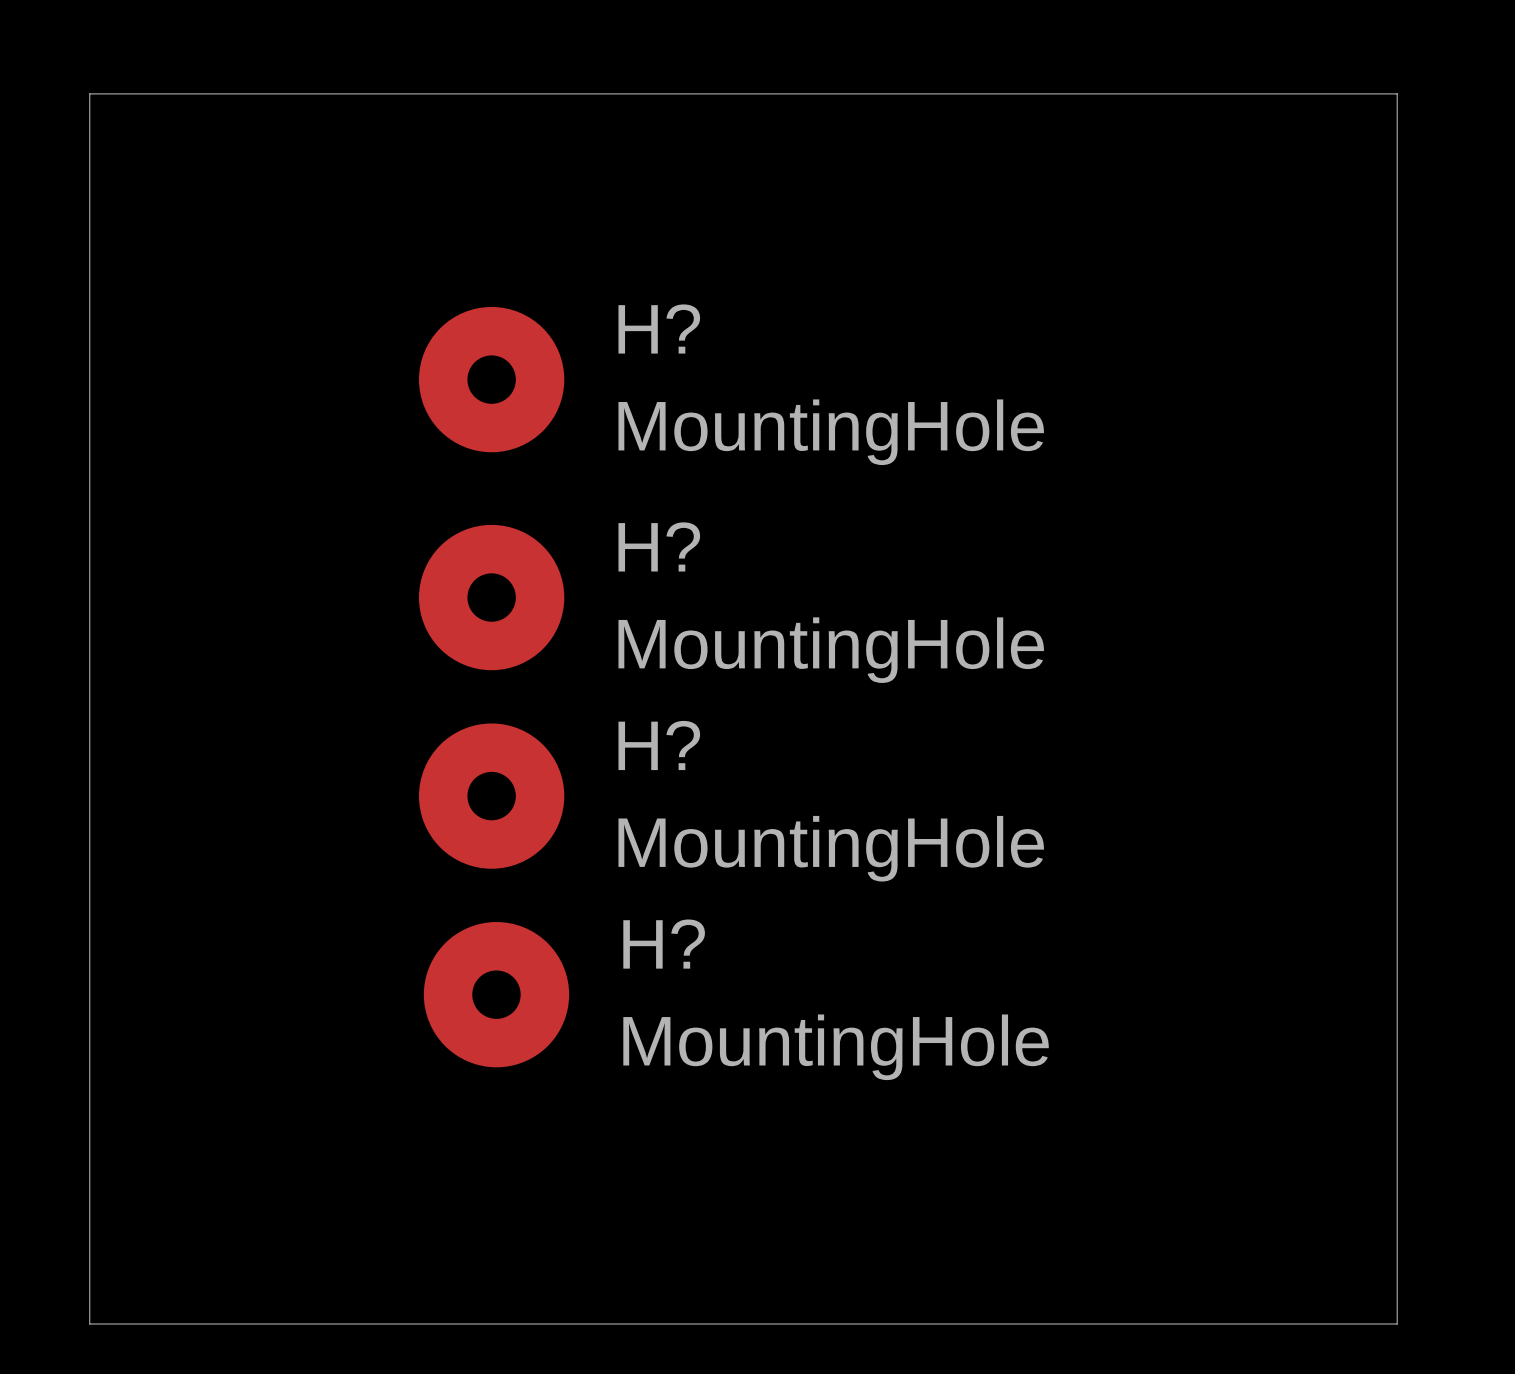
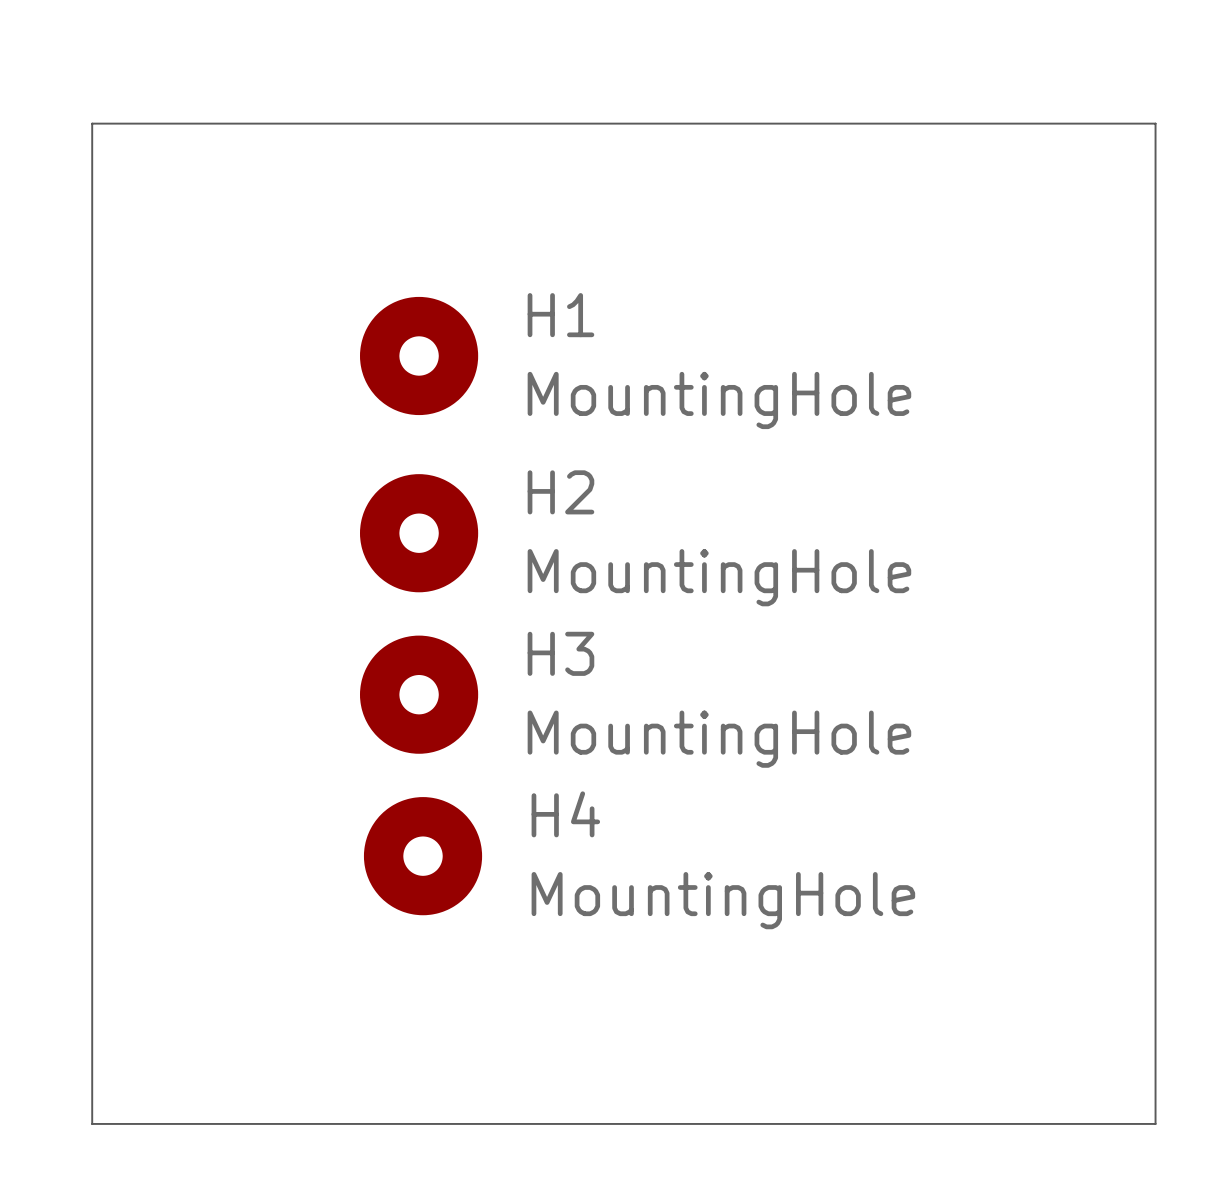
H? name: H? (659, 329) -> H1 (560, 315)
H? name: H? (659, 546) -> H2 (560, 492)
H? name: H? (659, 745) -> H3 (560, 653)
H? name: H? (664, 944) -> H4 (565, 814)

